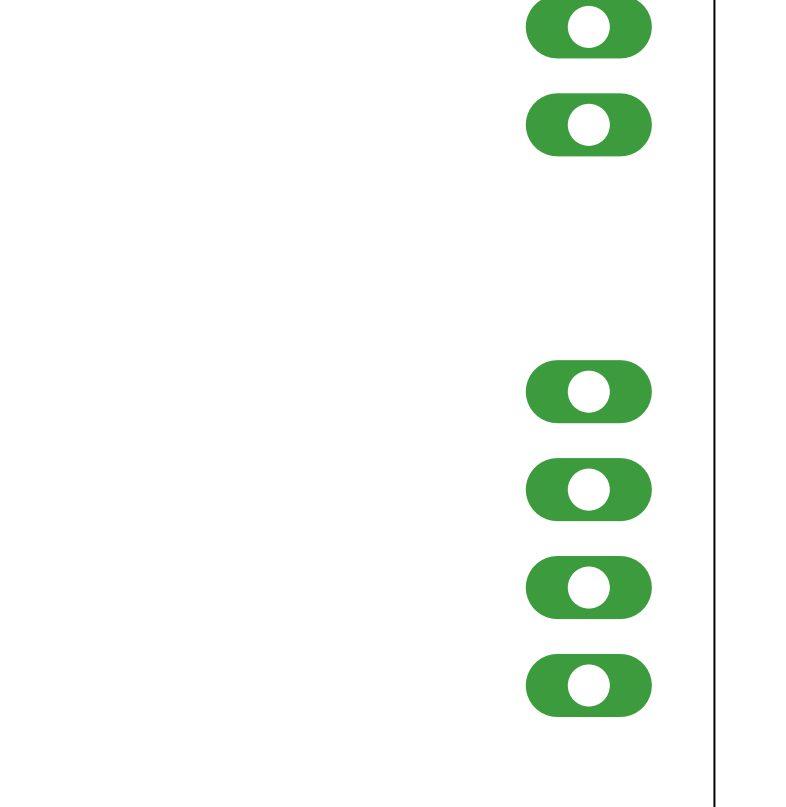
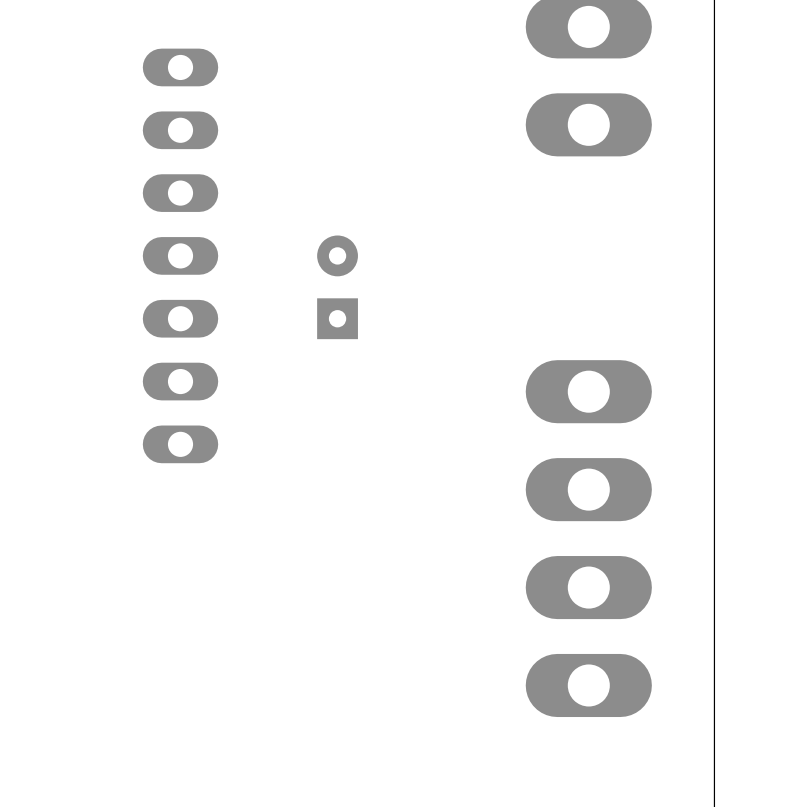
part: none -> (180, 255)
part: none -> (337, 287)

